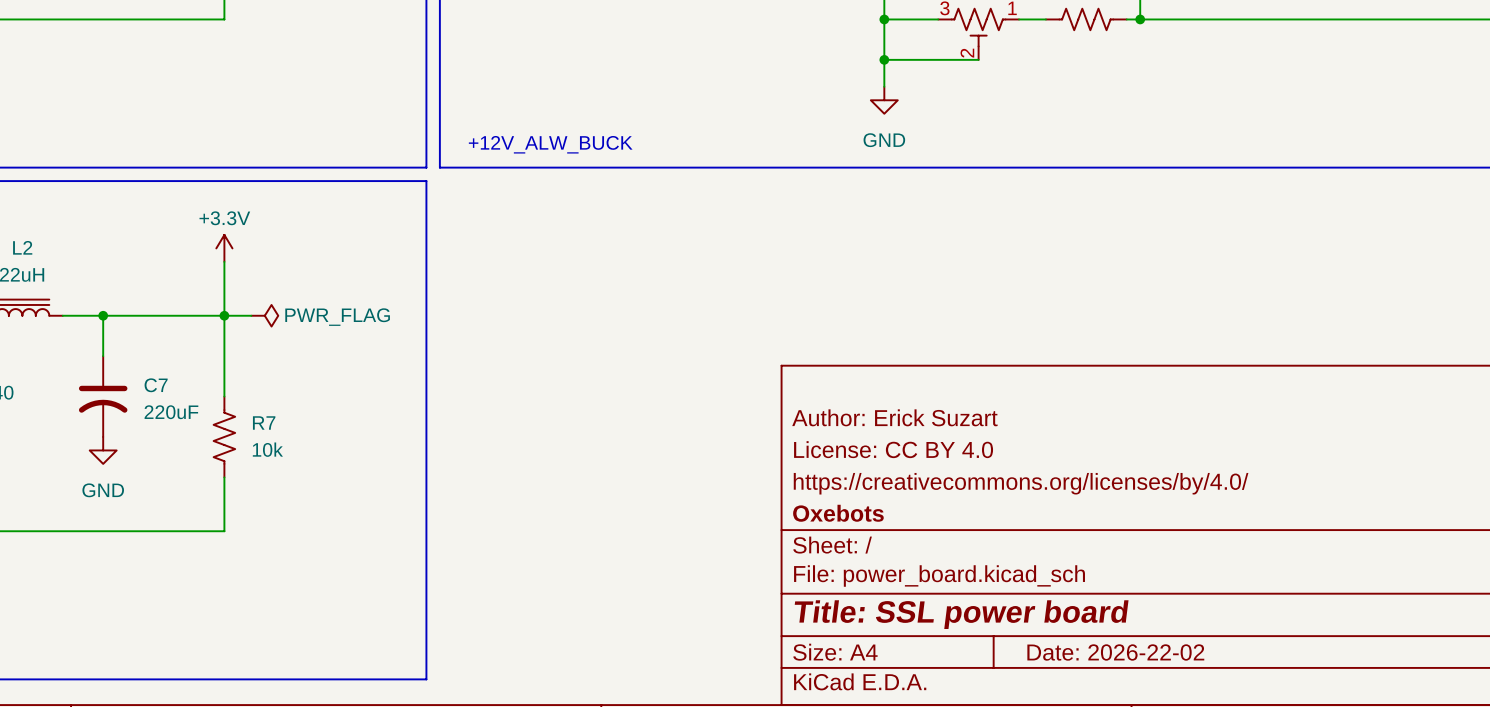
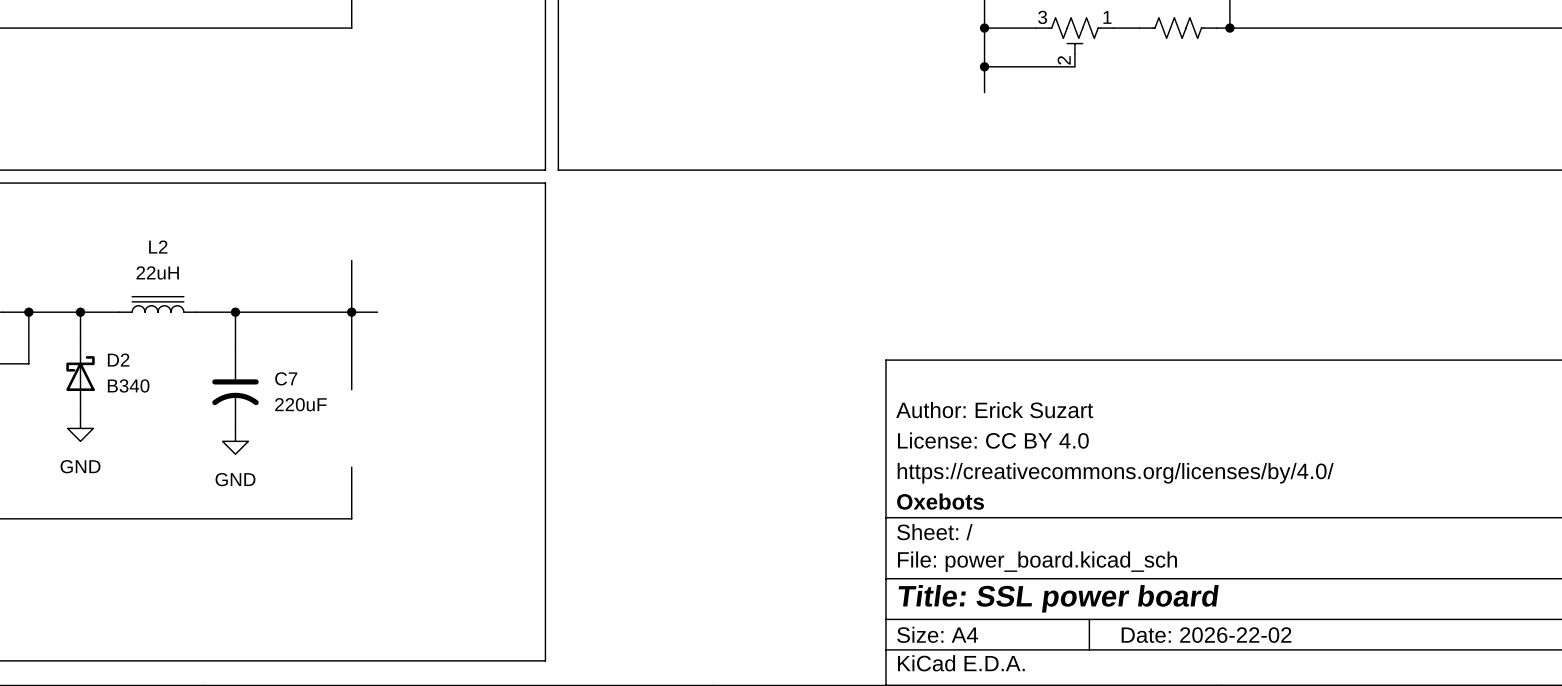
power symbol: GND (884, 100) -> none
text: +12V_ALW_BUCK (550, 144) -> none
power symbol: +3.3V (224, 248) -> none
power symbol: PWR_FLAG (264, 315) -> none
R7: 10k (224, 436) -> none

